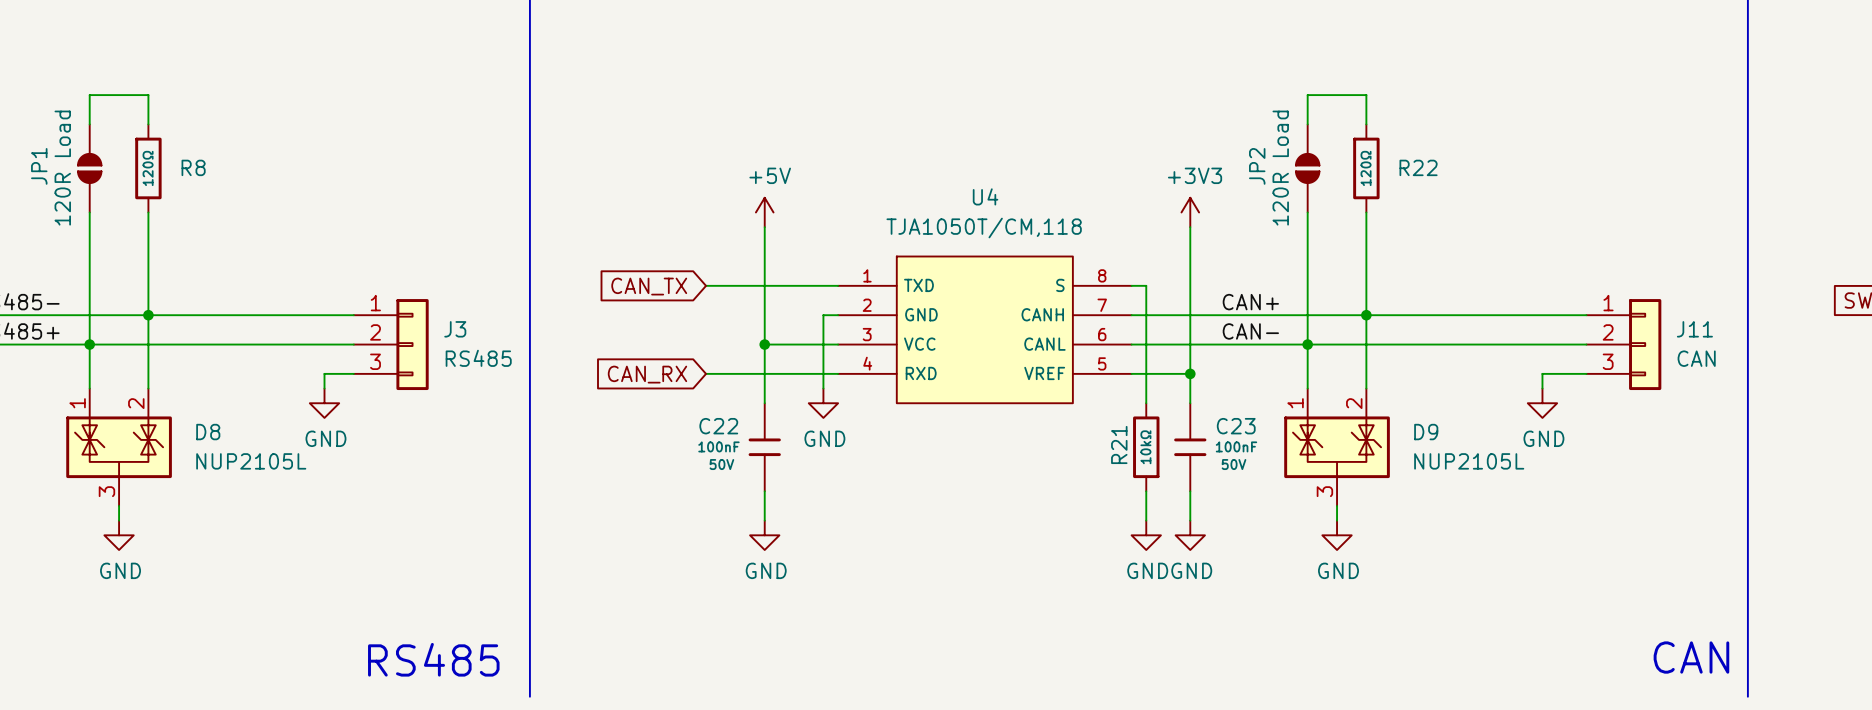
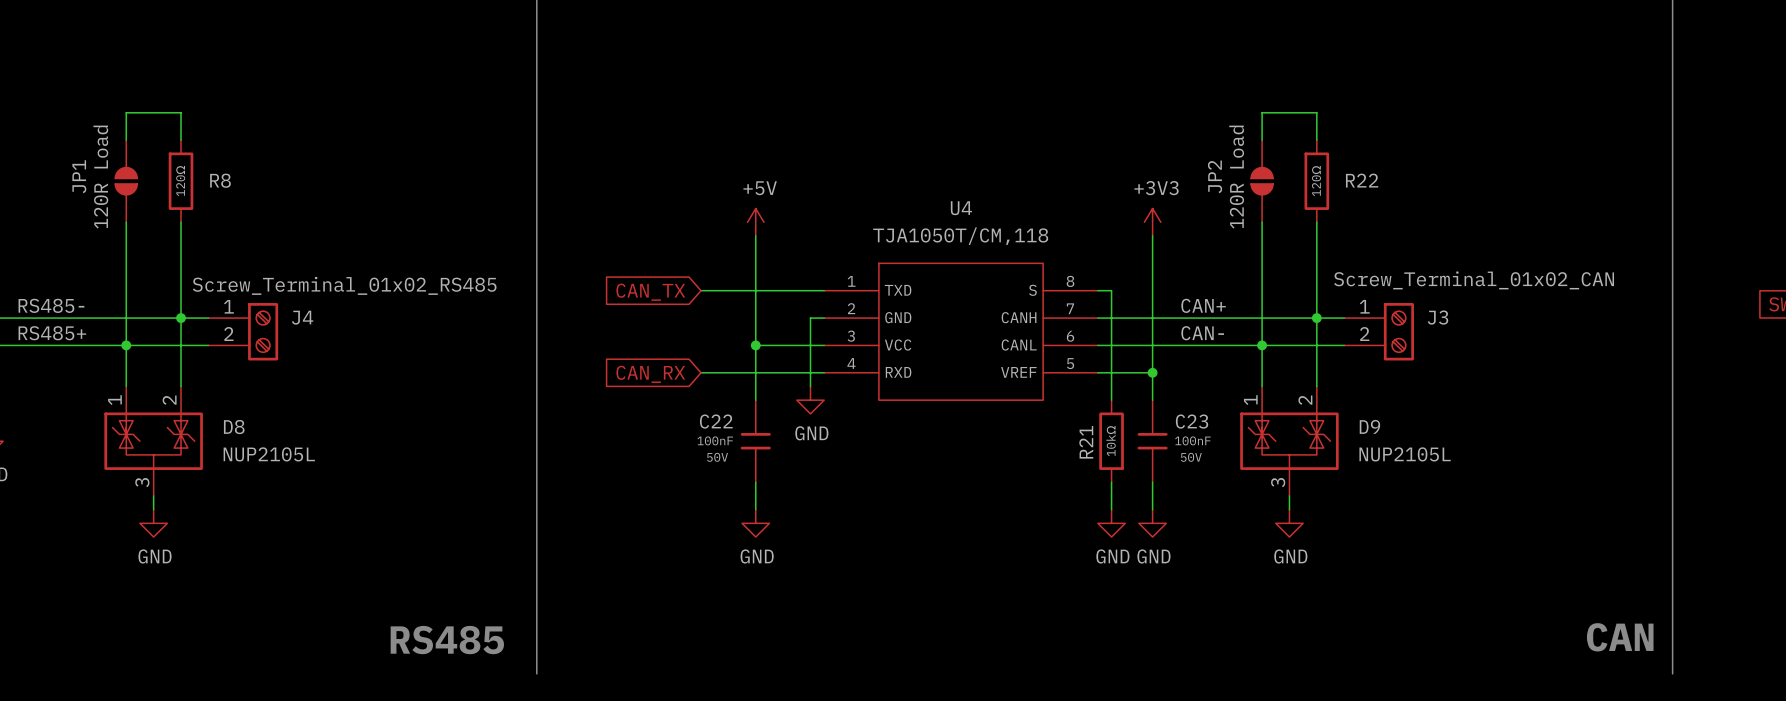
J3 symbol: [353, 299, 429, 391] -> [1344, 303, 1414, 361]
wire: (177, 315) (353, 315) -> none
wire: (1395, 315) (1586, 315) -> none
J4: none -> Screw_Terminal_01x02_RS485 (243, 331)
wire: (177, 344) (353, 344) -> none
wire: (1395, 344) (1586, 344) -> none
J11: CAN (1623, 344) -> none
J3 value: RS485 (478, 358) -> Screw_Terminal_01x02_CAN (1474, 280)
wire: (353, 373) (324, 373) (324, 388) -> none
wire: (1586, 373) (1542, 373) (1542, 388) -> none
power symbol: GND (324, 403) -> none
power symbol: GND (1542, 403) -> none

